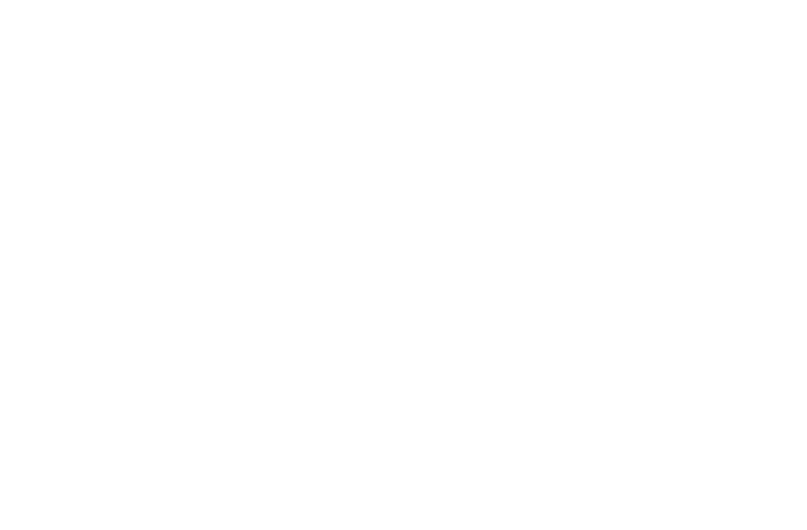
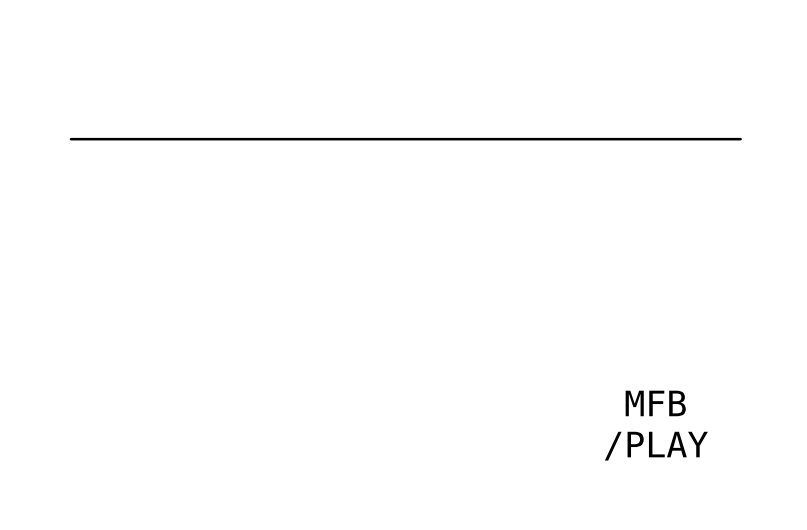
board edge: none -> (71, 139) (740, 139)
text: none -> MFB (655, 403)
text: none -> /PLAY (656, 446)

